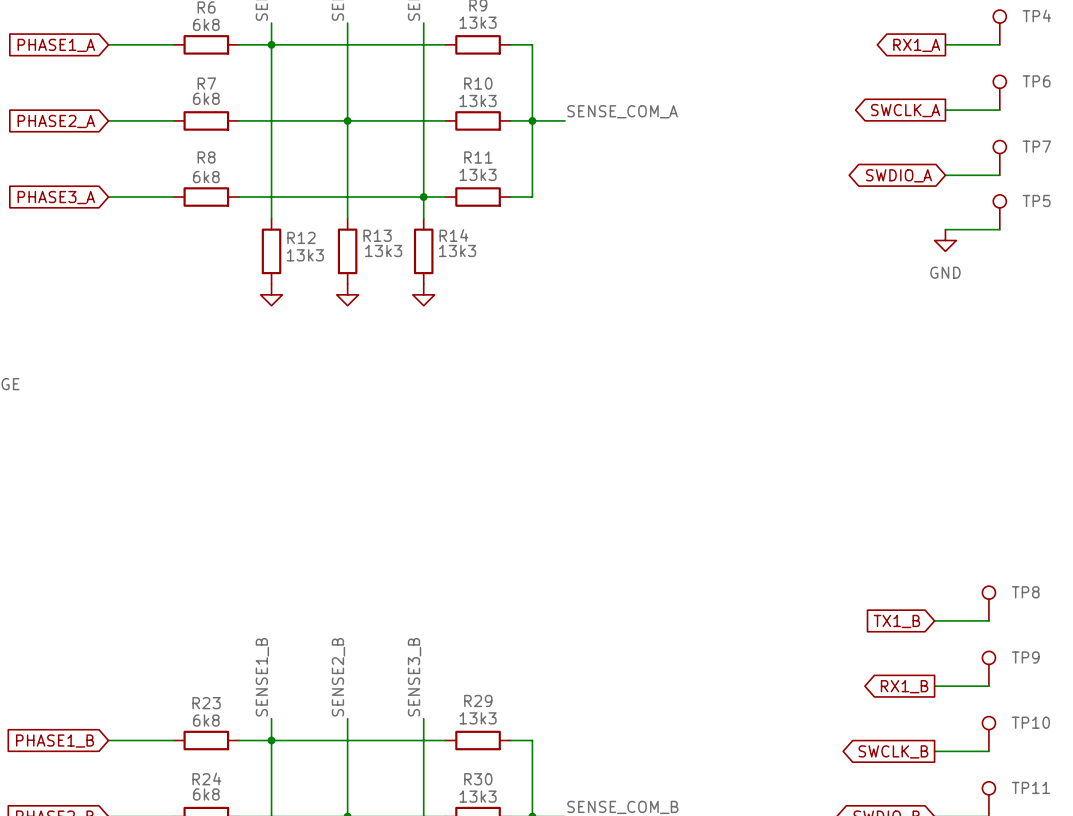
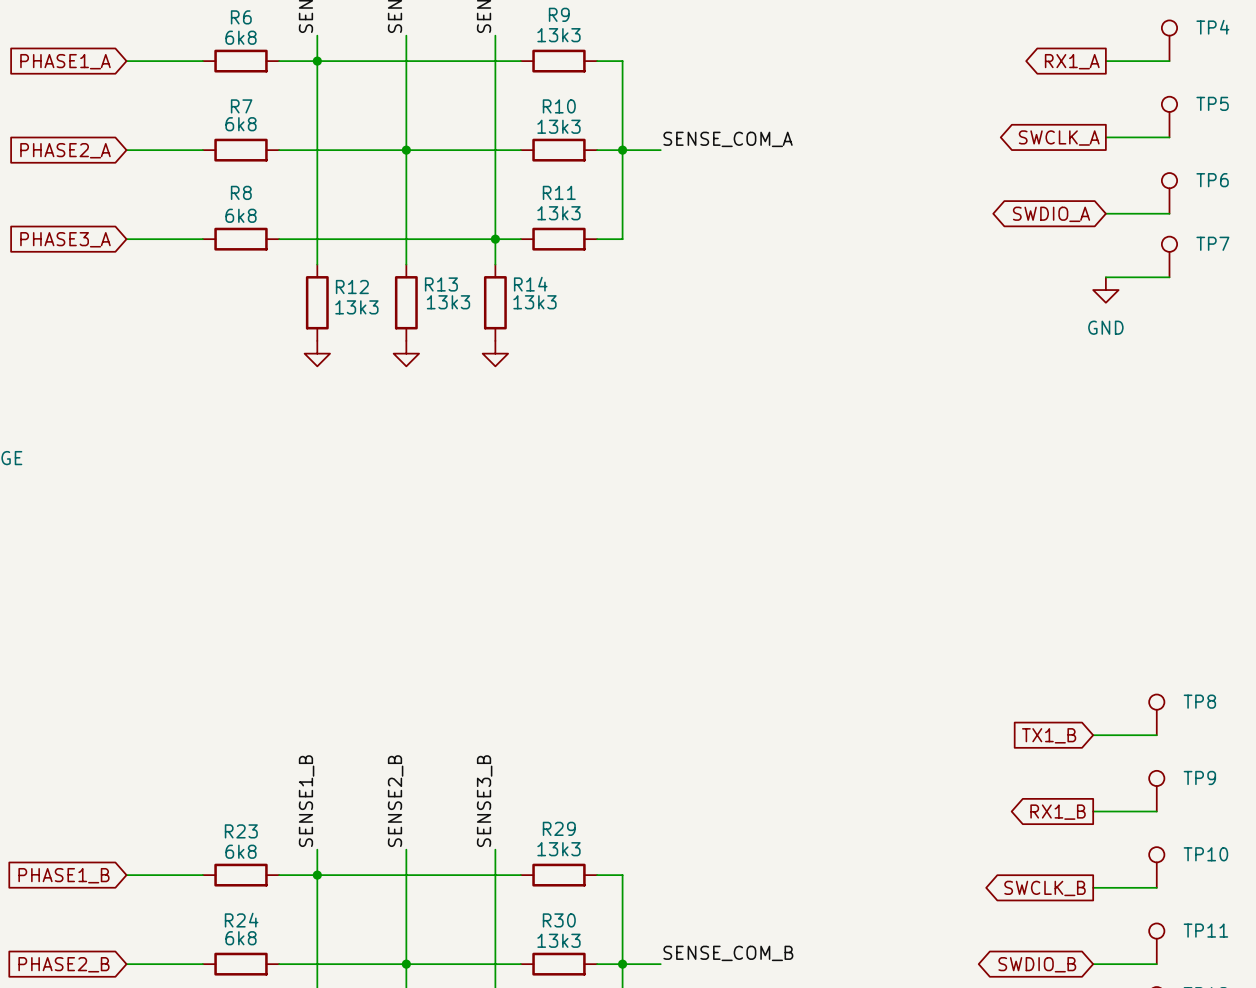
TP6 name: TP6 (1036, 81) -> TP5 (1212, 103)
TP7 name: TP7 (1036, 146) -> TP6 (1212, 180)
TP5 name: TP5 (1036, 200) -> TP7 (1212, 243)

